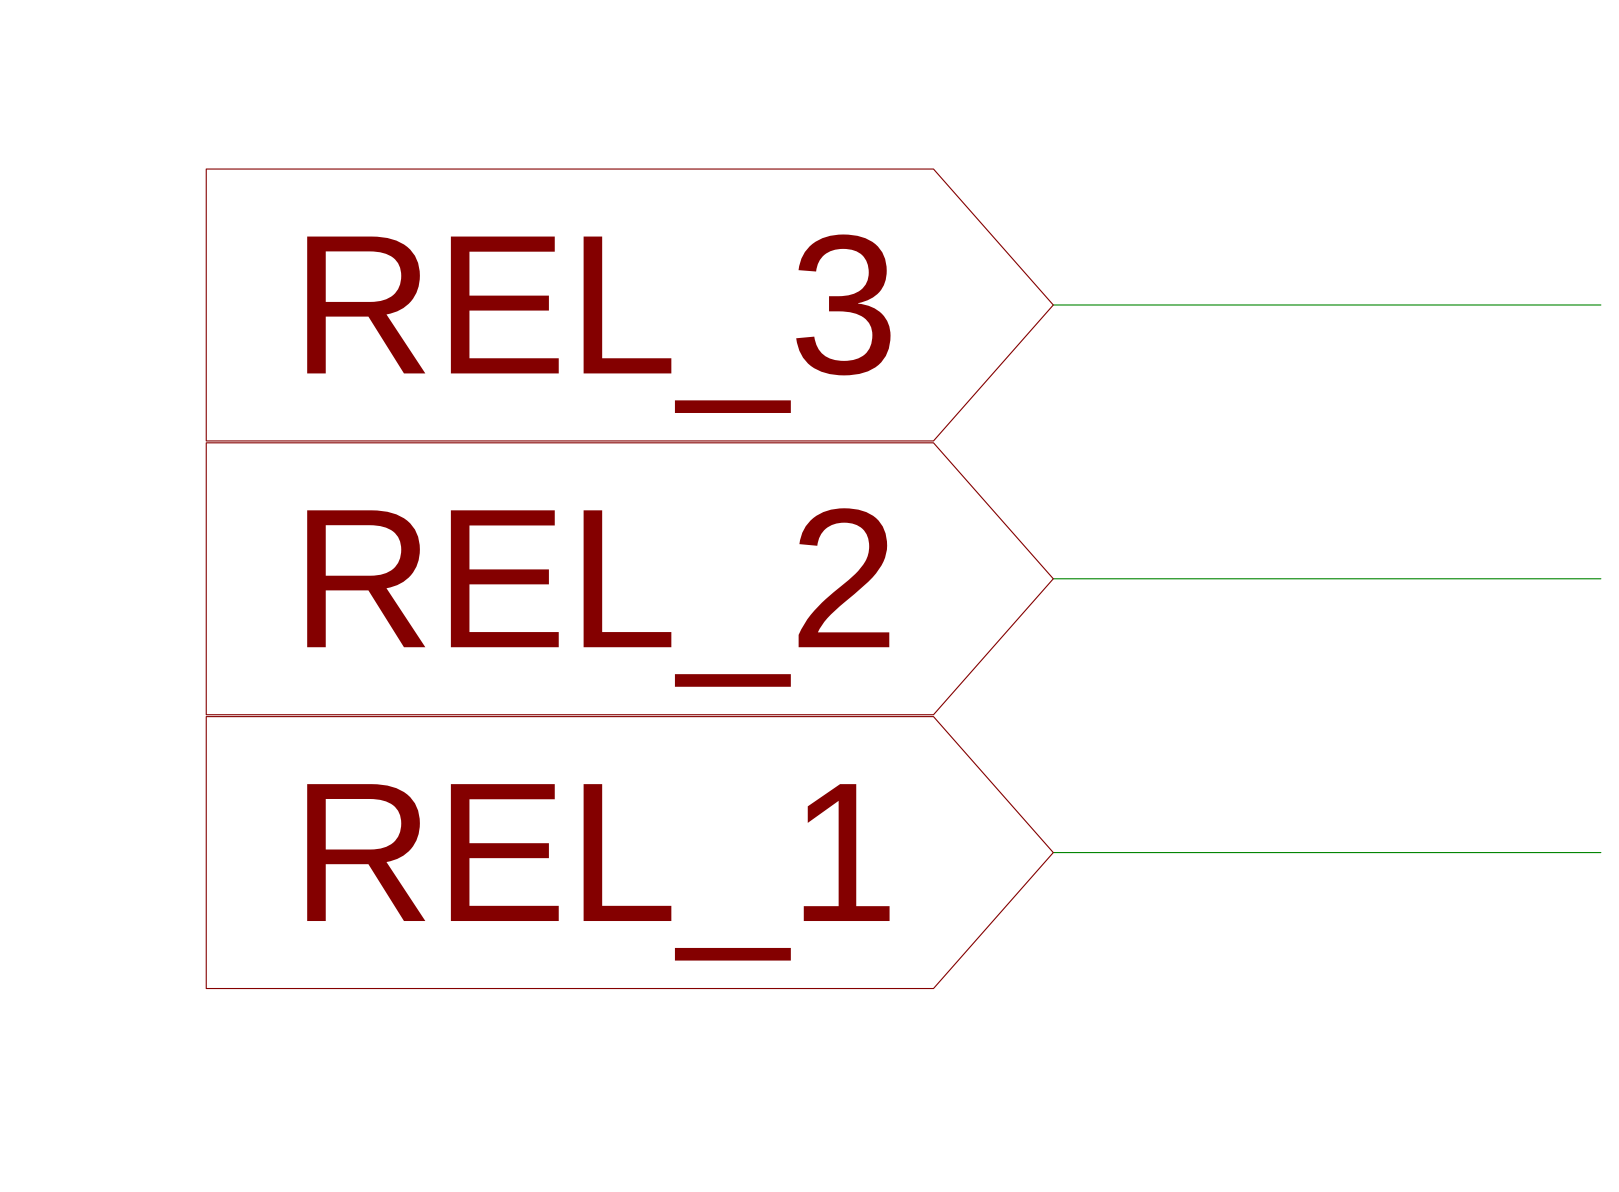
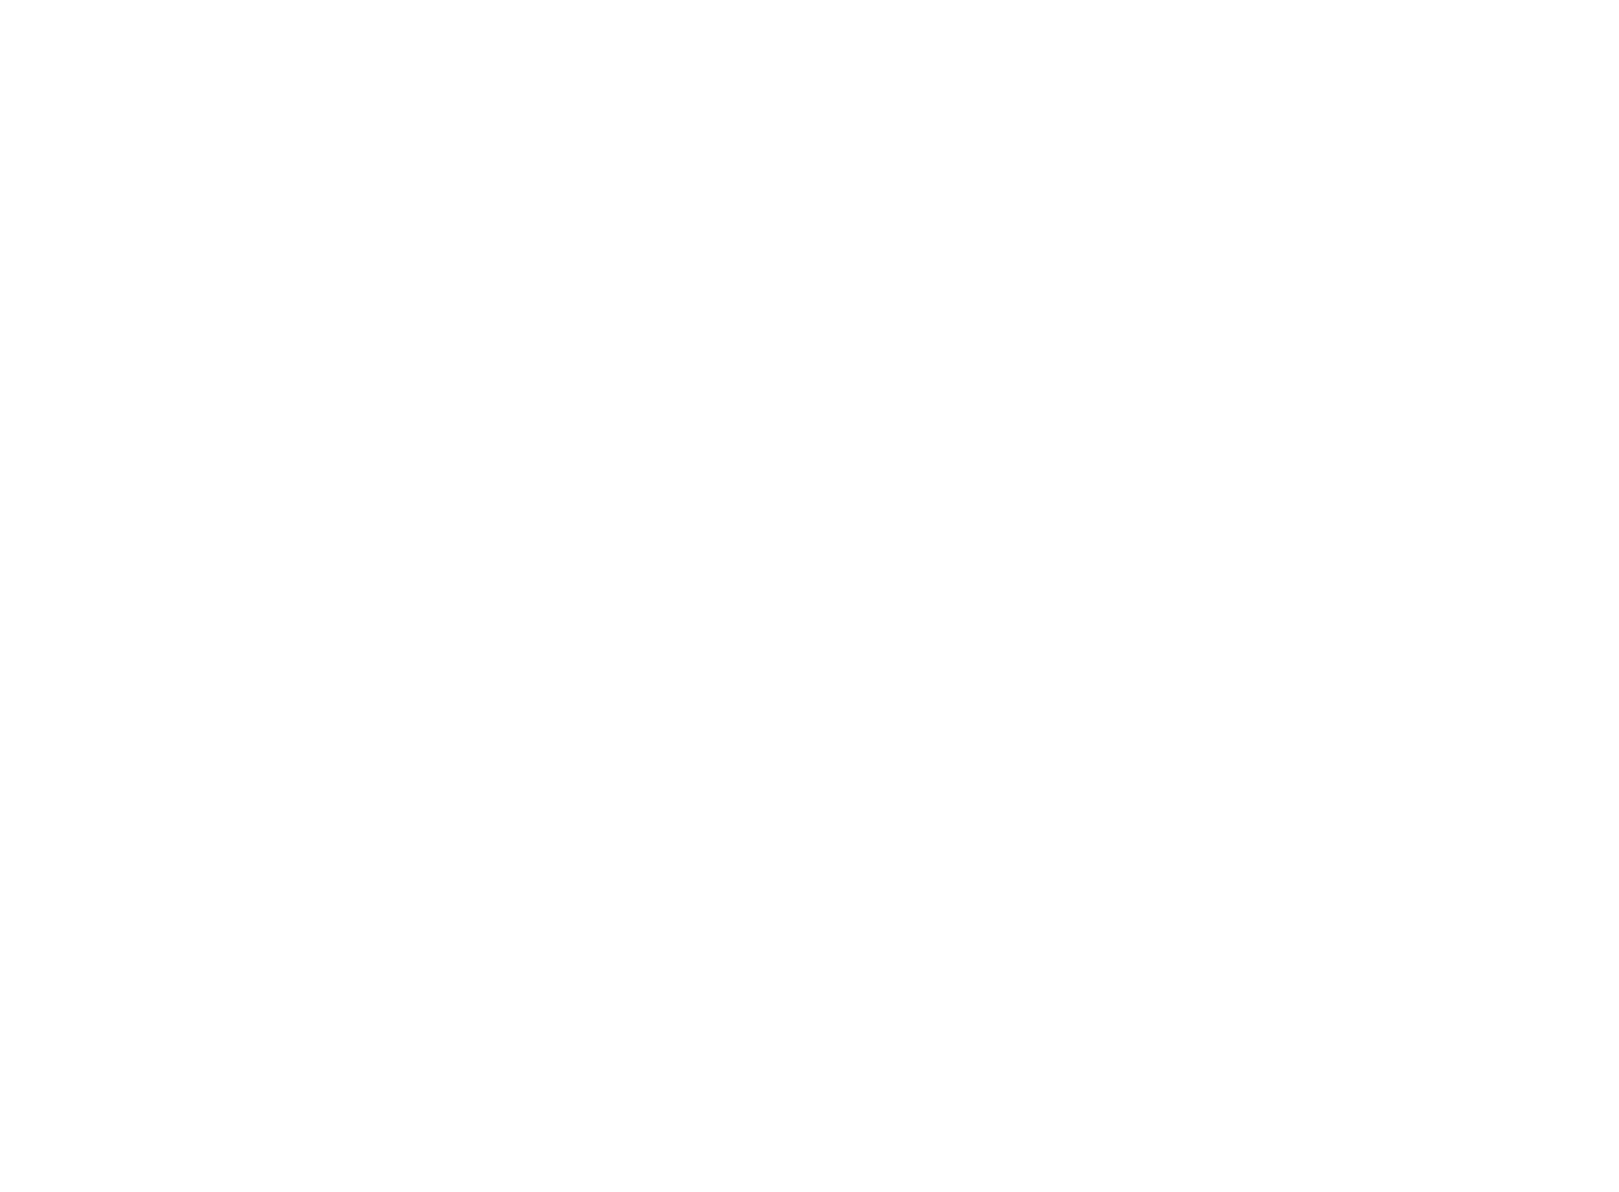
wire: (1053, 304) (1600, 304) -> none
global label: REL_3 (598, 323) -> none
wire: (1053, 578) (1600, 578) -> none
global label: REL_2 (598, 597) -> none
wire: (1053, 852) (1600, 852) -> none
global label: REL_1 (598, 872) -> none

